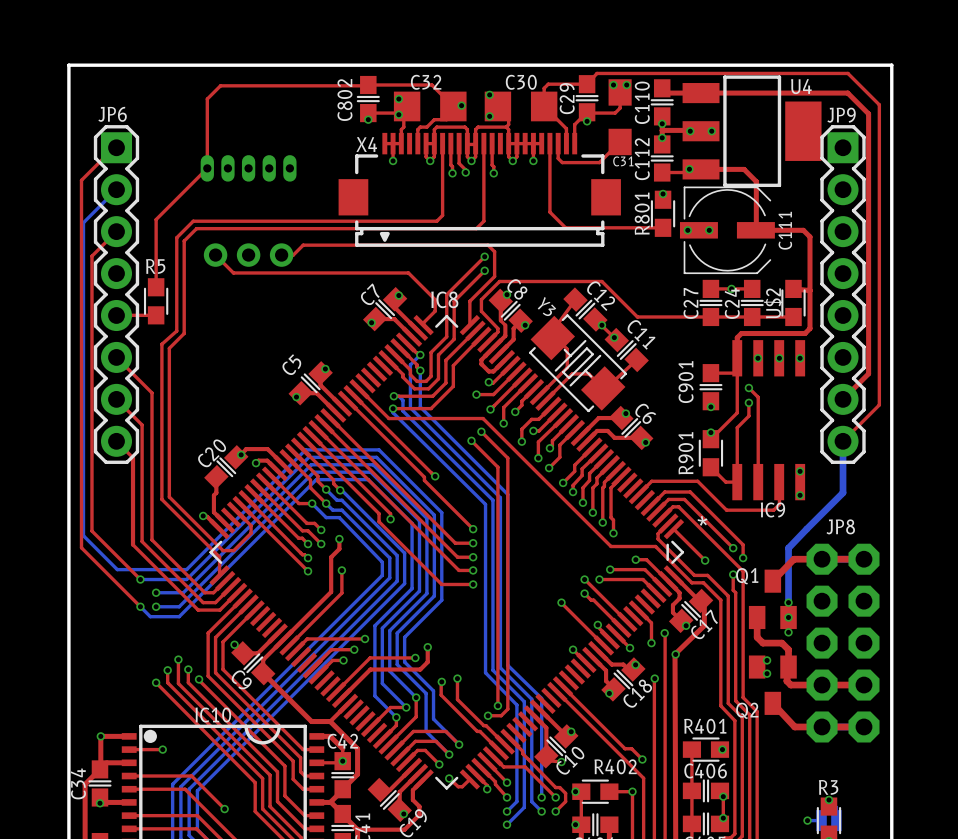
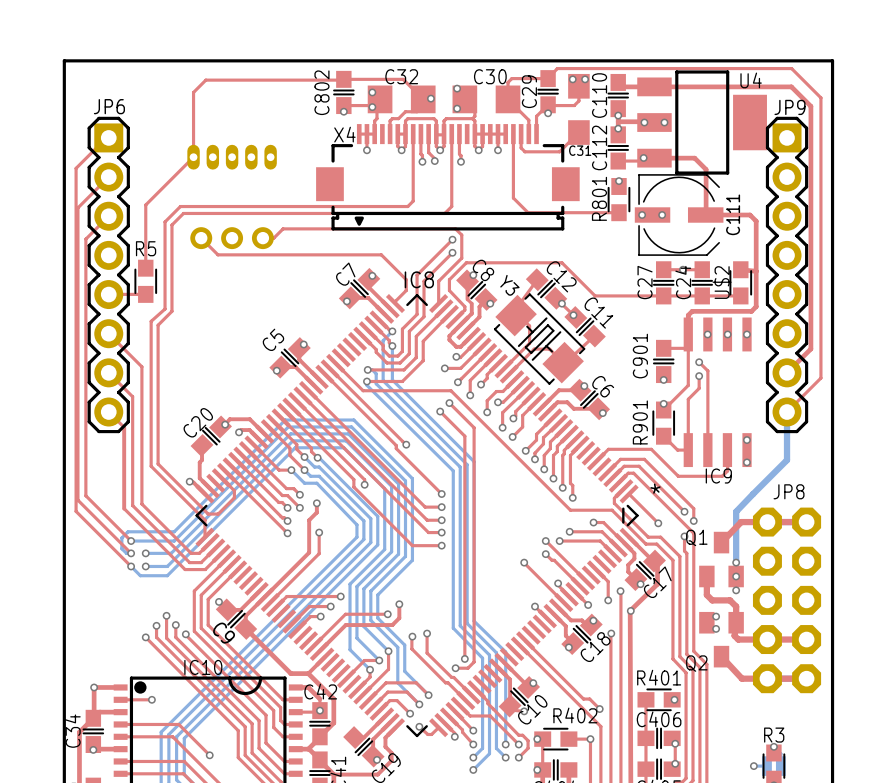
top track: none -> (108, 177) (77, 207) (77, 500) (131, 553)
bottom track: (116, 189) (83, 222) (83, 535) (117, 569) (137, 569) -> (131, 553) (126, 553) (121, 548) (121, 537) (128, 531)
via: none -> (131, 553)

